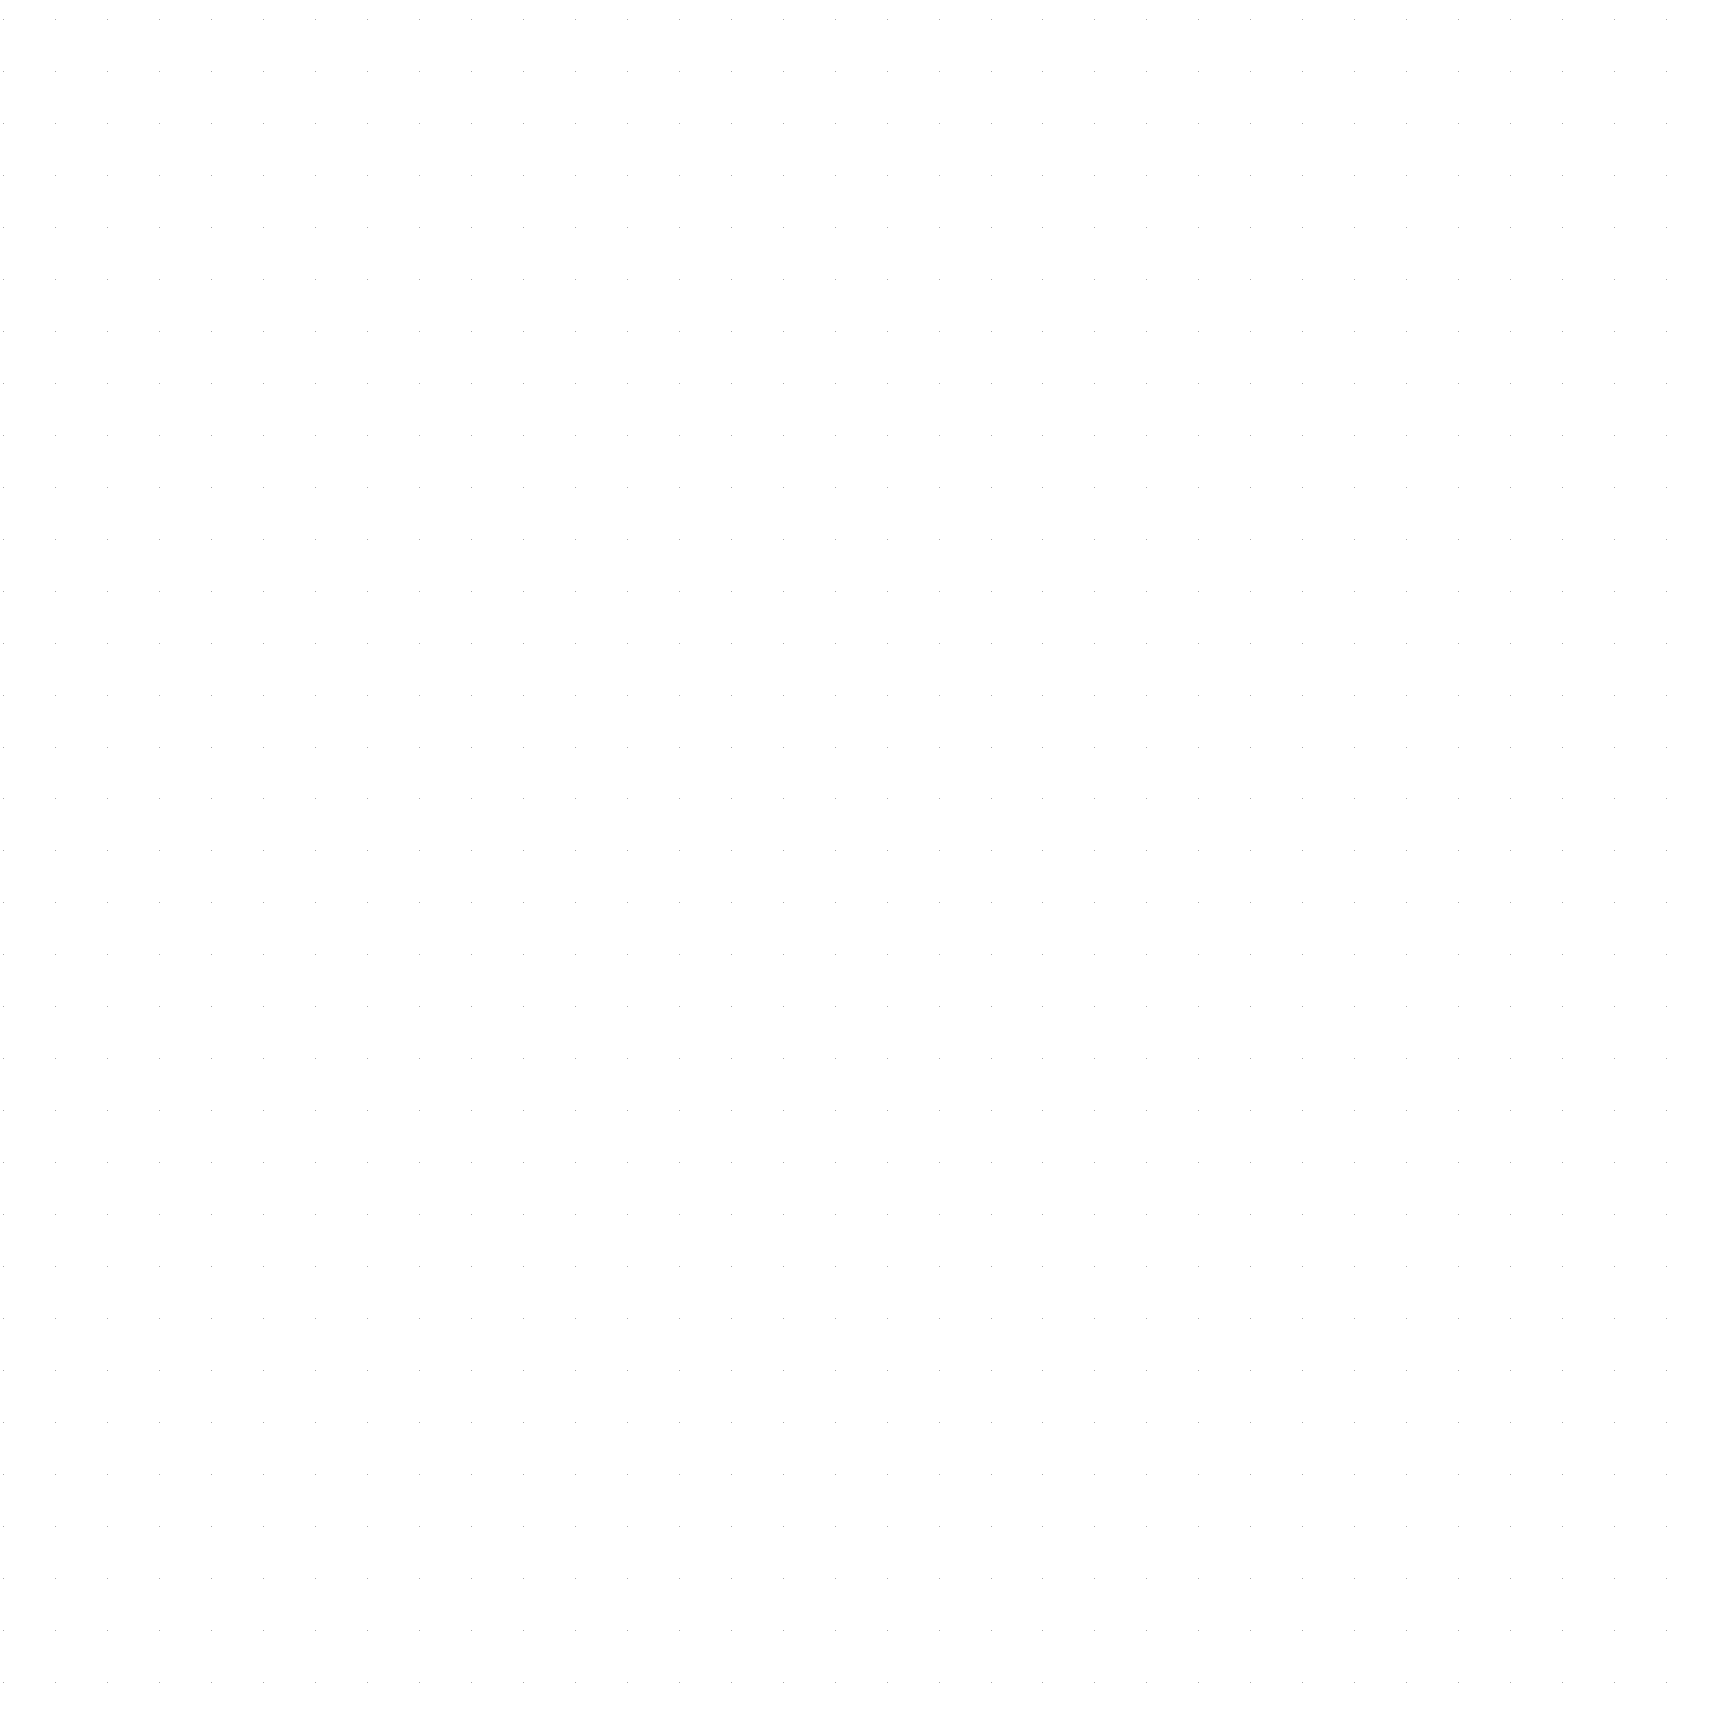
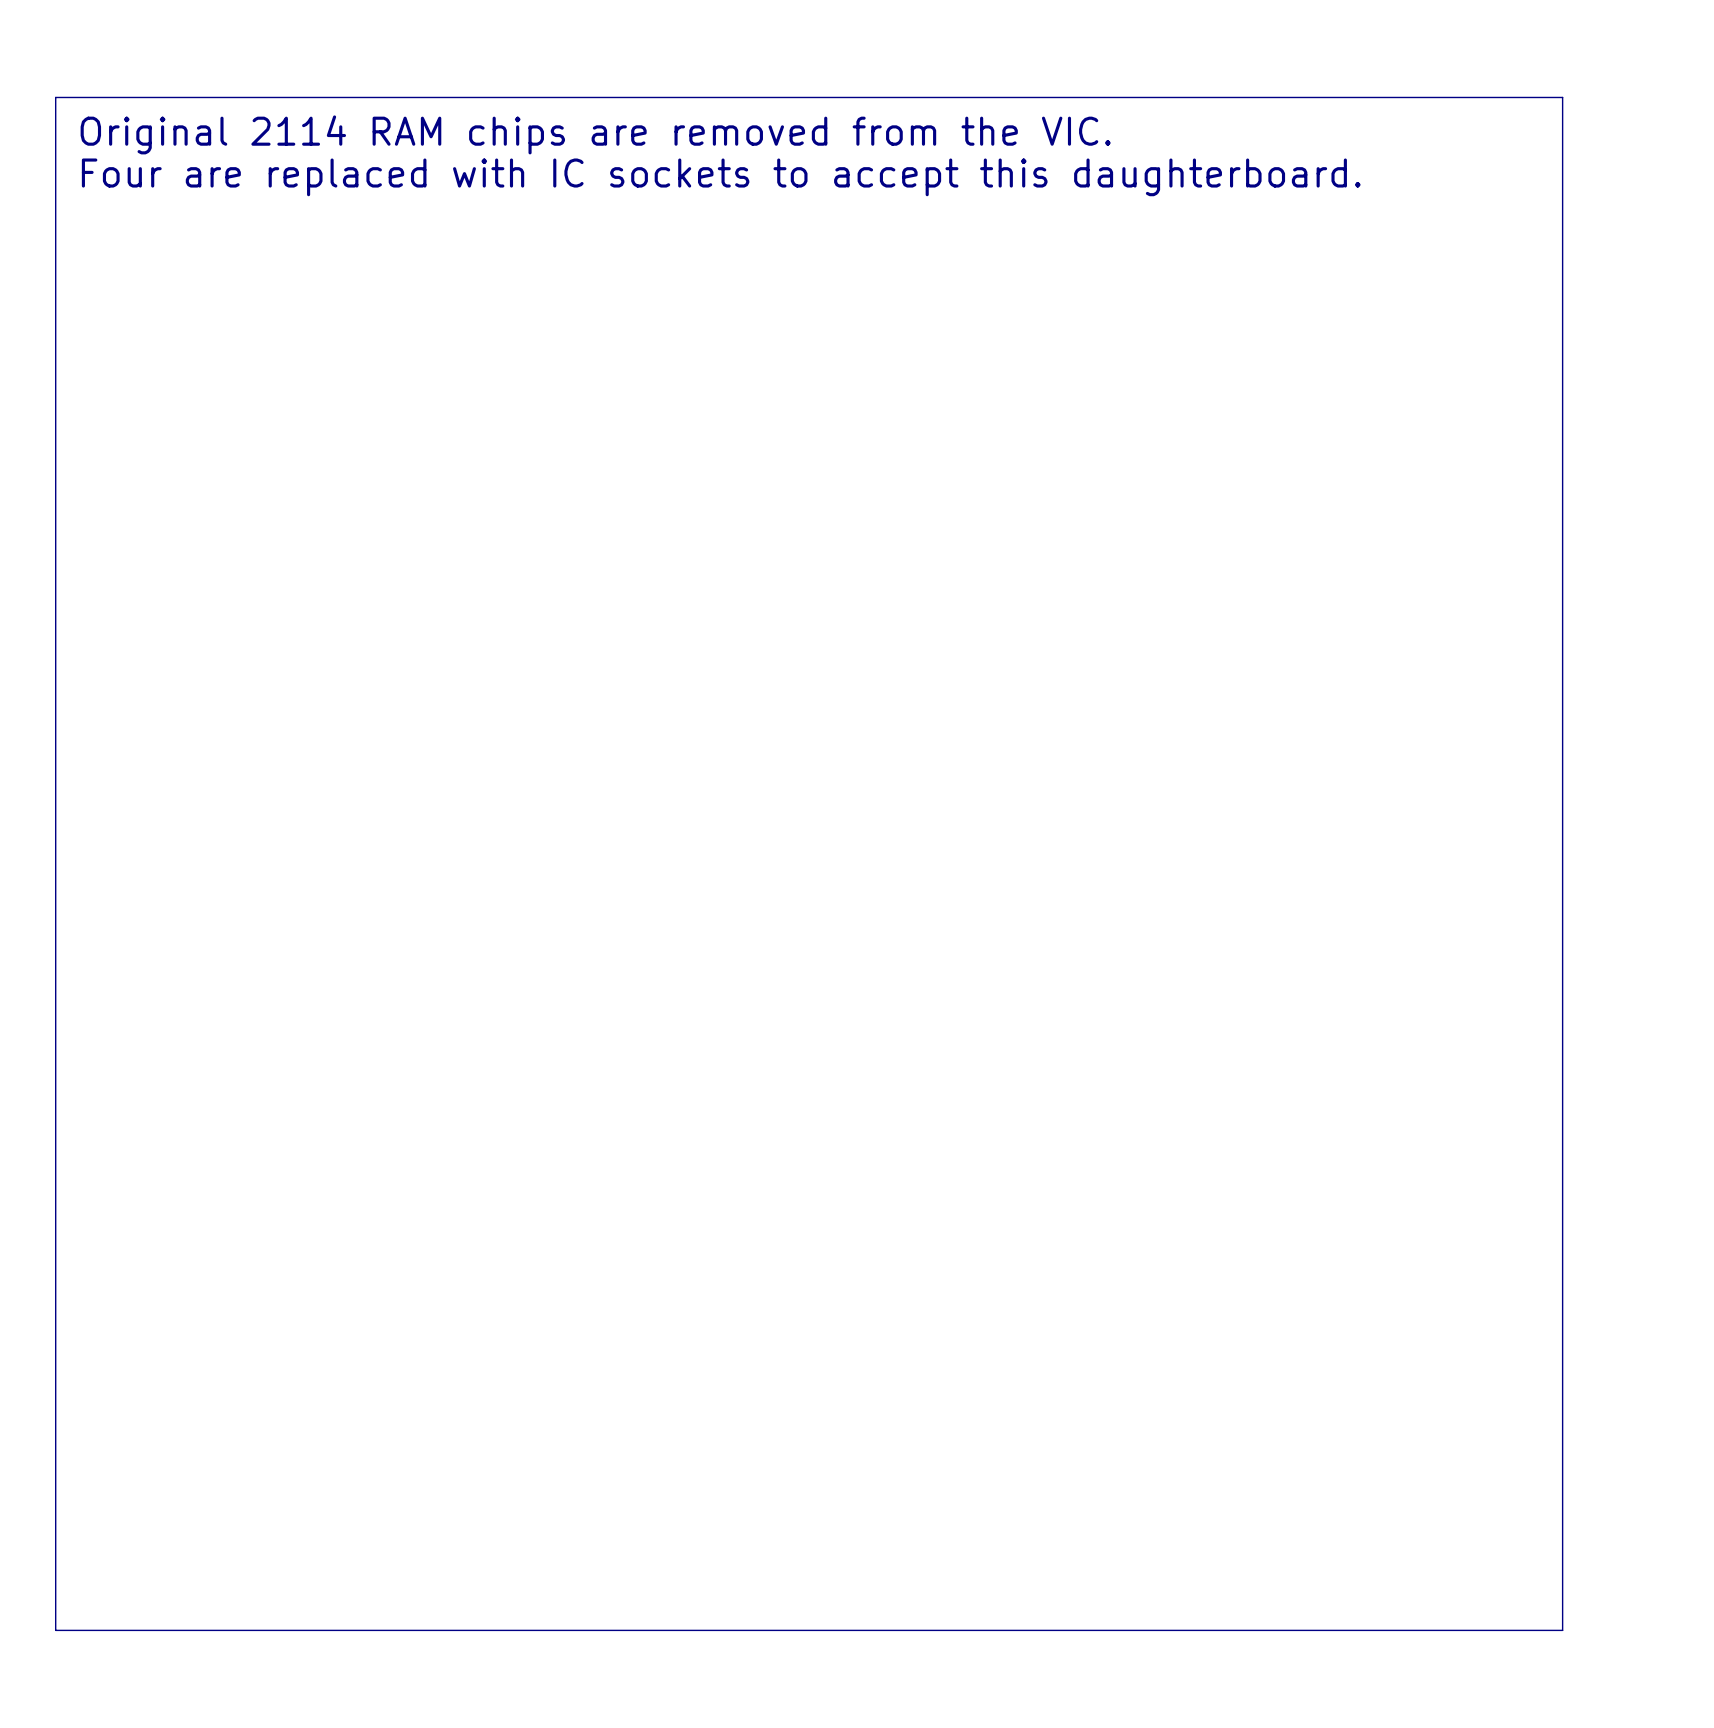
line: none -> (55, 97) (1562, 97) (1562, 1630) (55, 1630) (55, 97)
text: none -> Original 2114 RAM chips are removed from the VIC. (595, 134)
text: none -> Four are replaced with IC sockets to accept this daughterboard. (721, 177)

